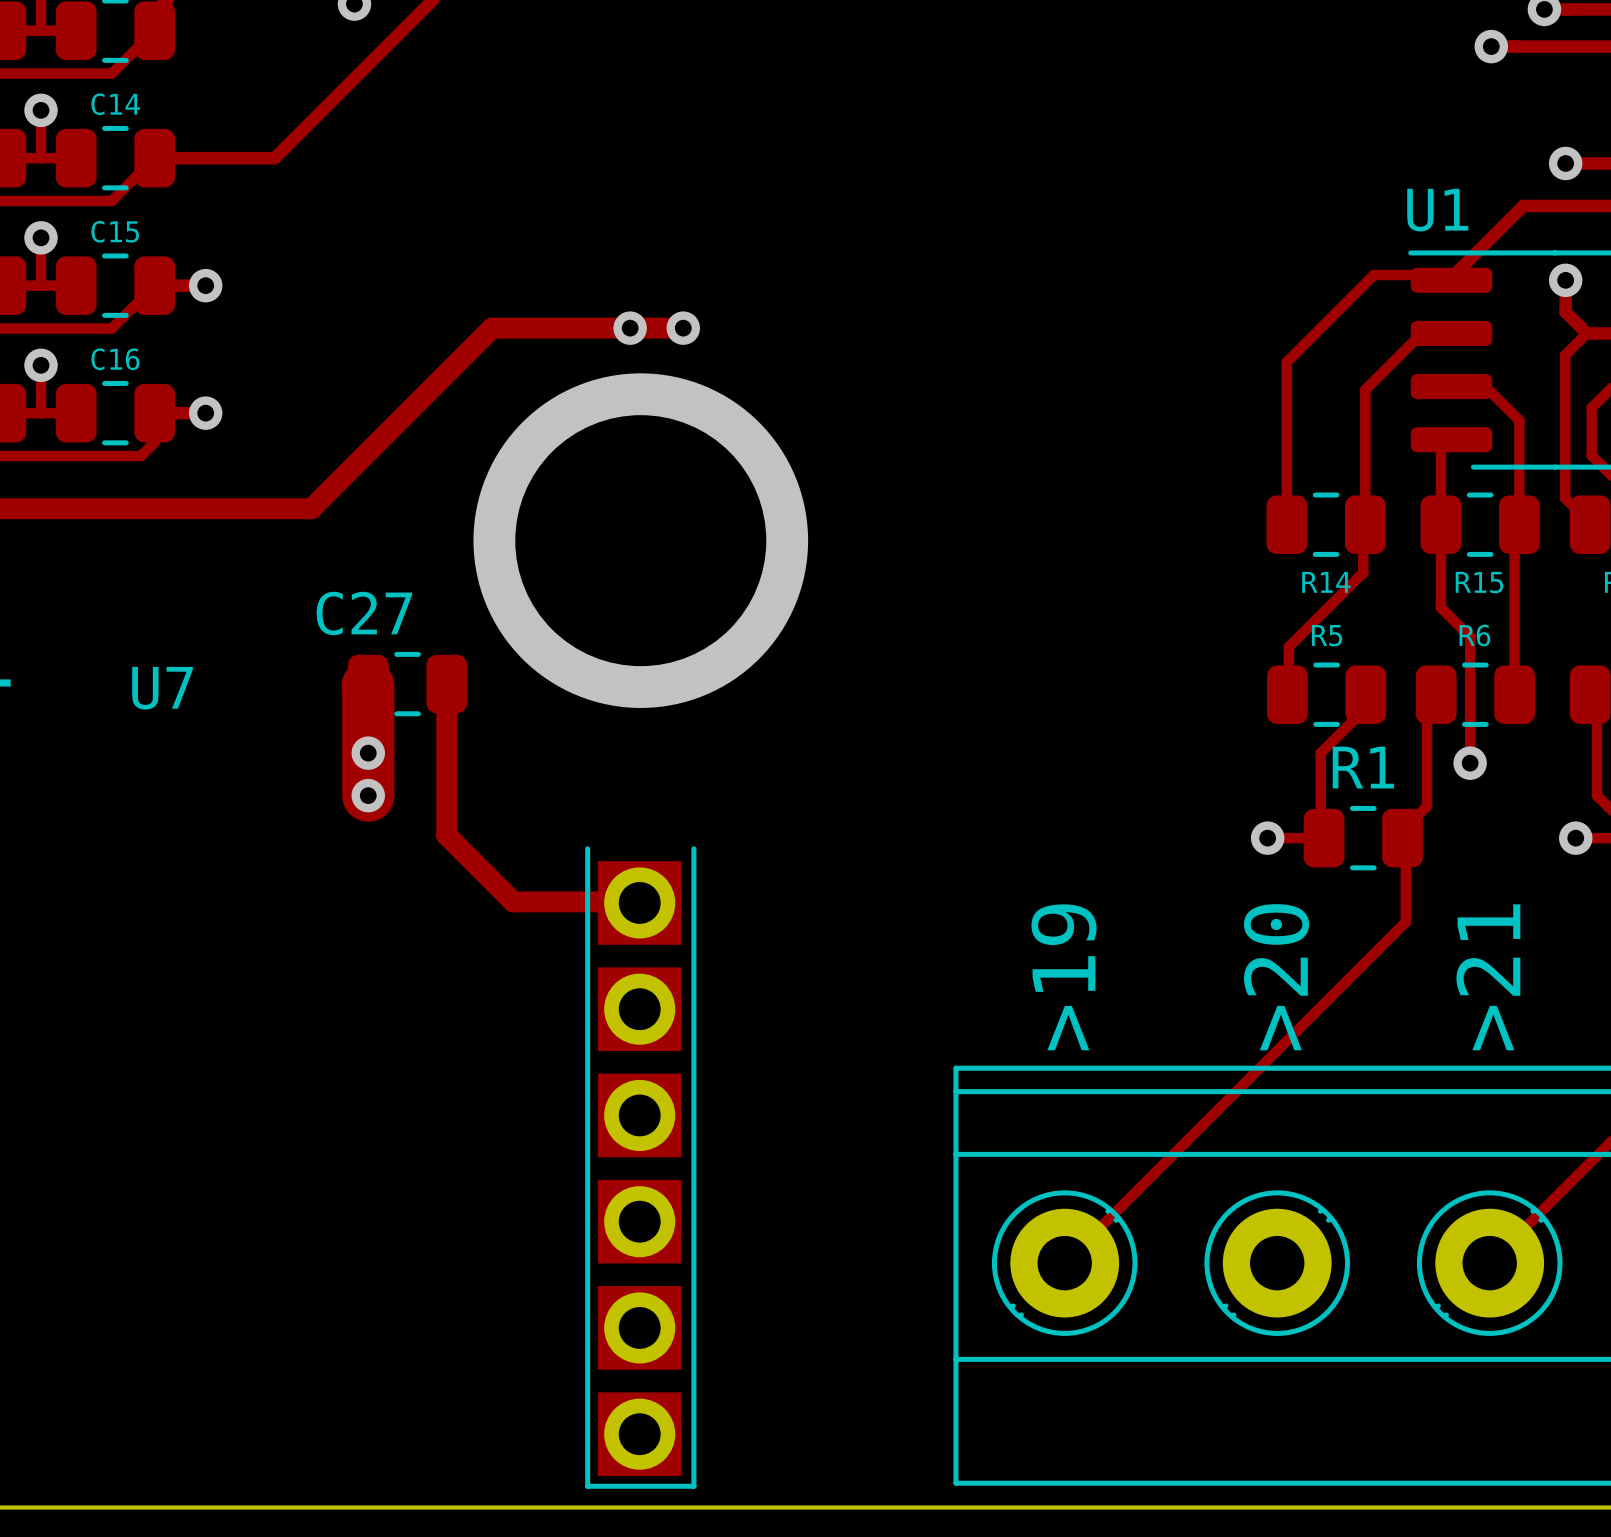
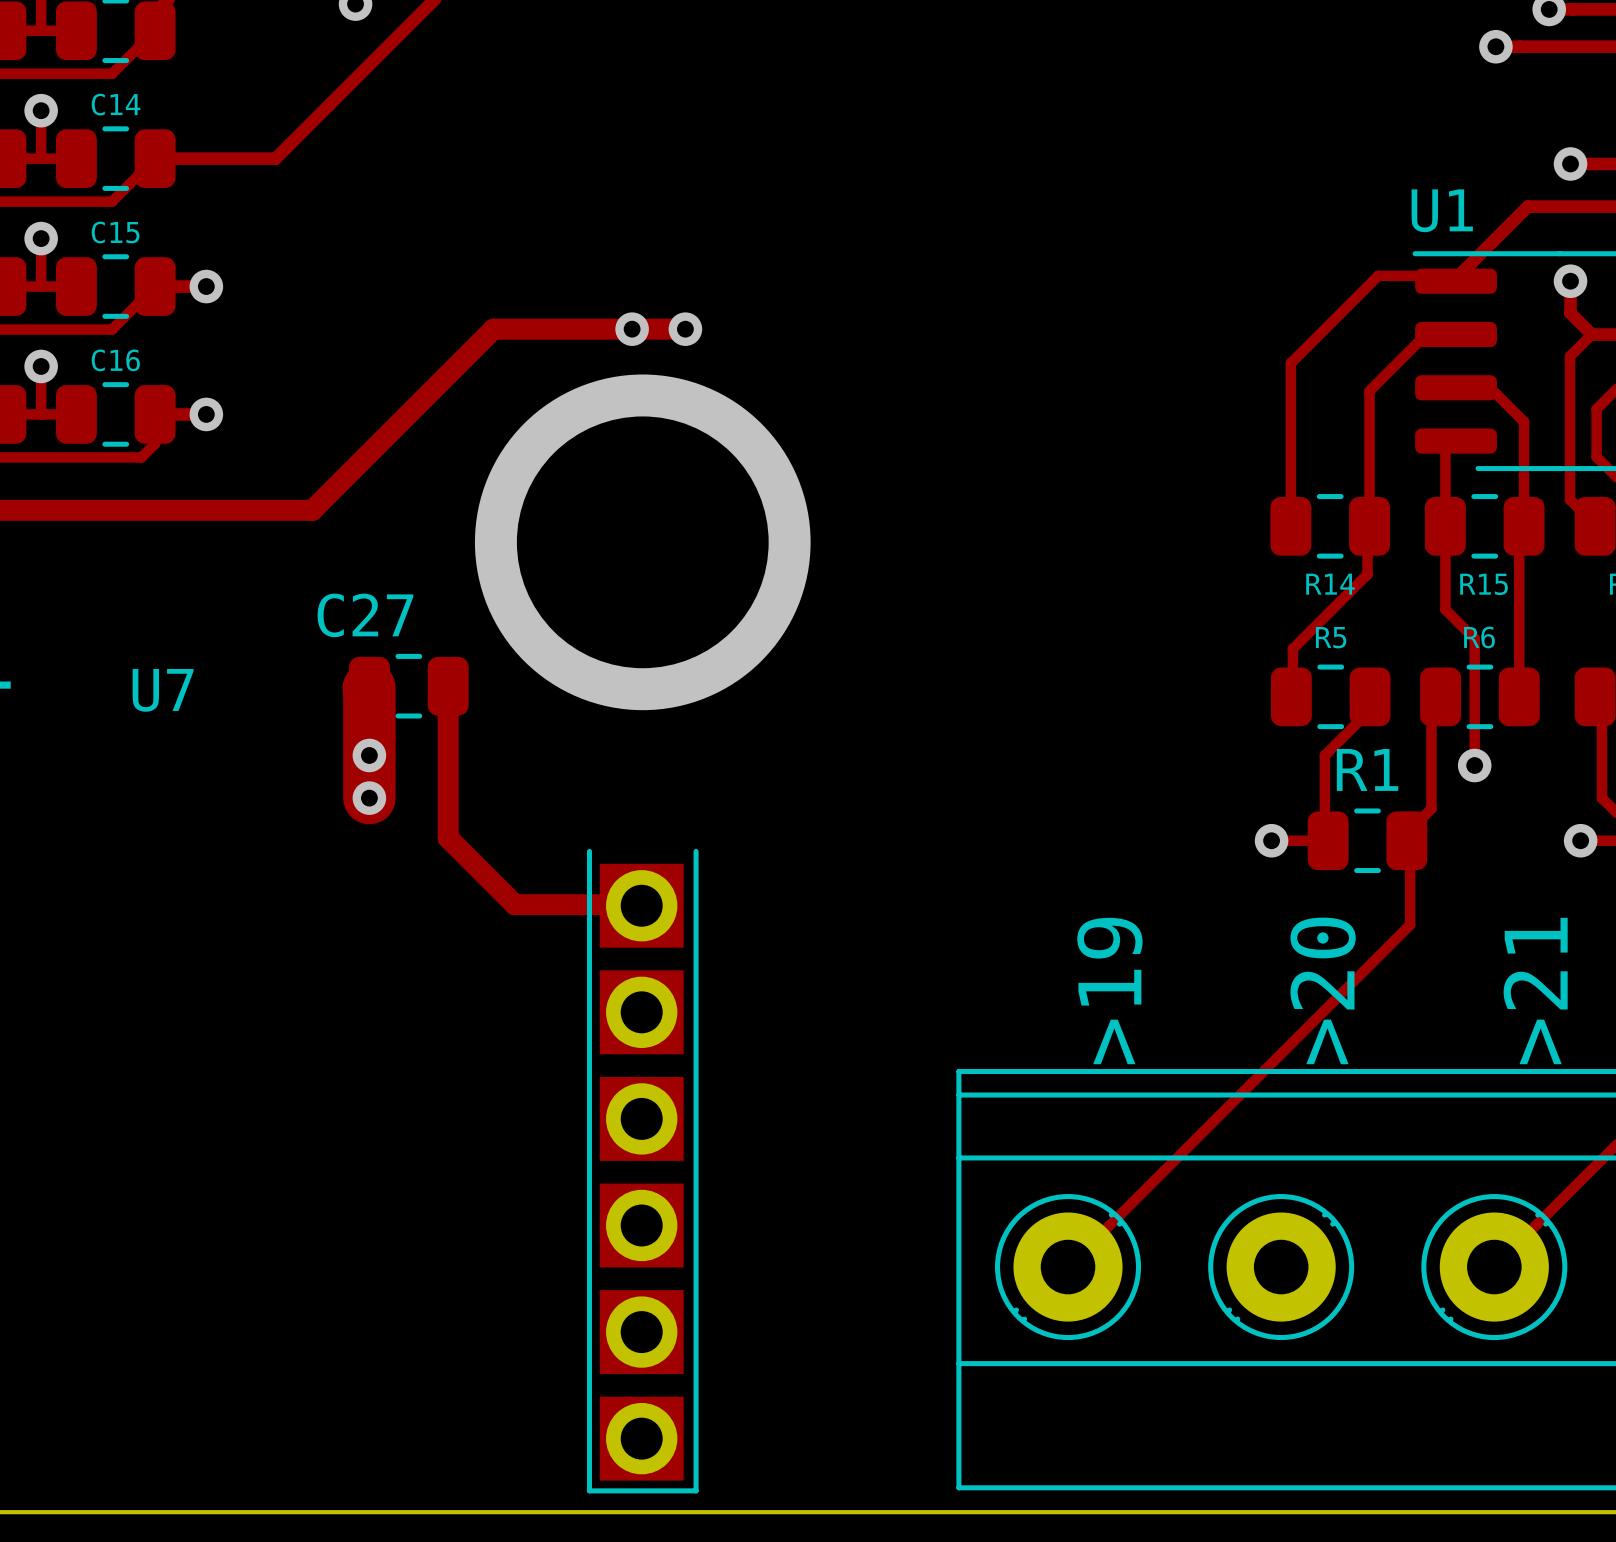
text position: >19 (1064, 977) -> >19 (1109, 991)
text position: >20 (1276, 977) -> >20 (1323, 990)
text position: >21 (1488, 977) -> >21 (1535, 991)

